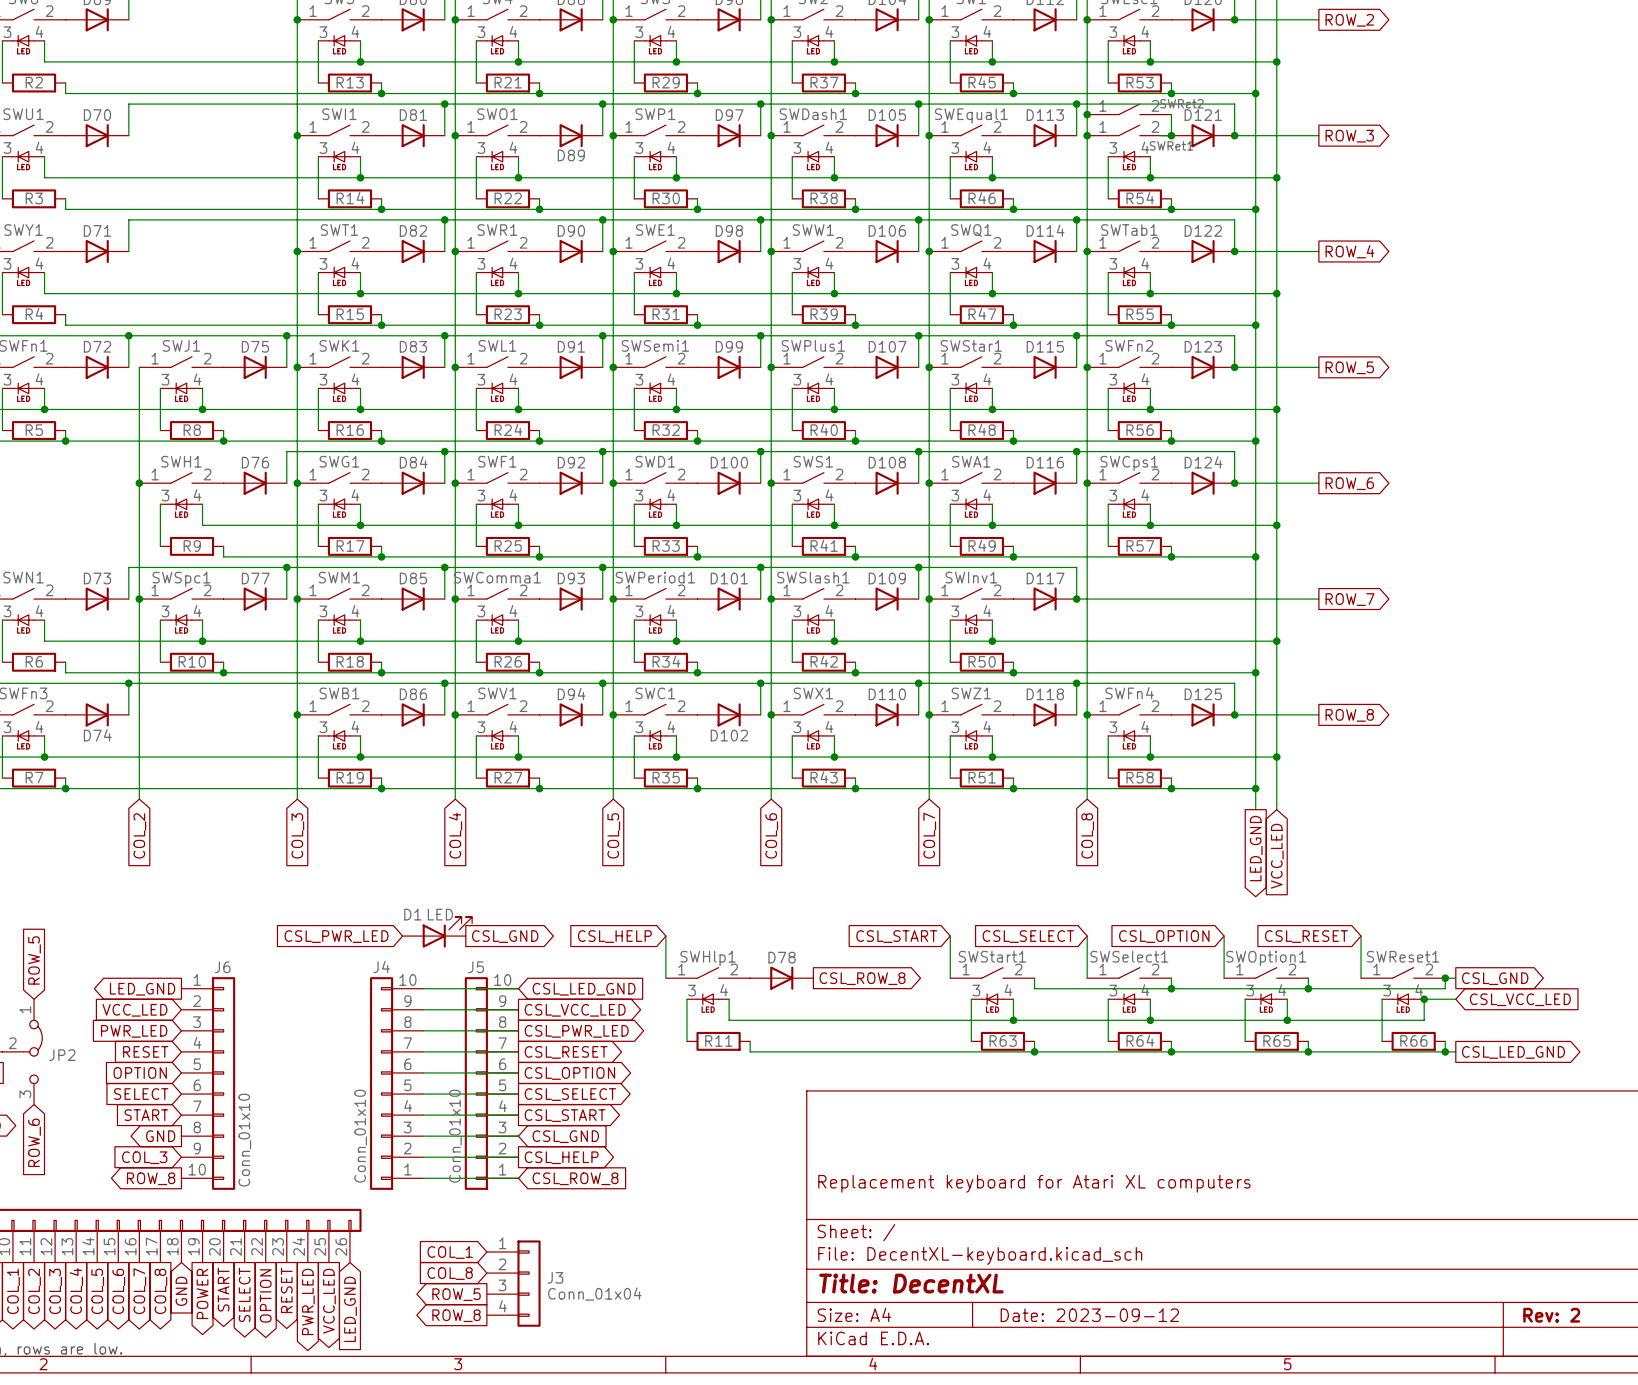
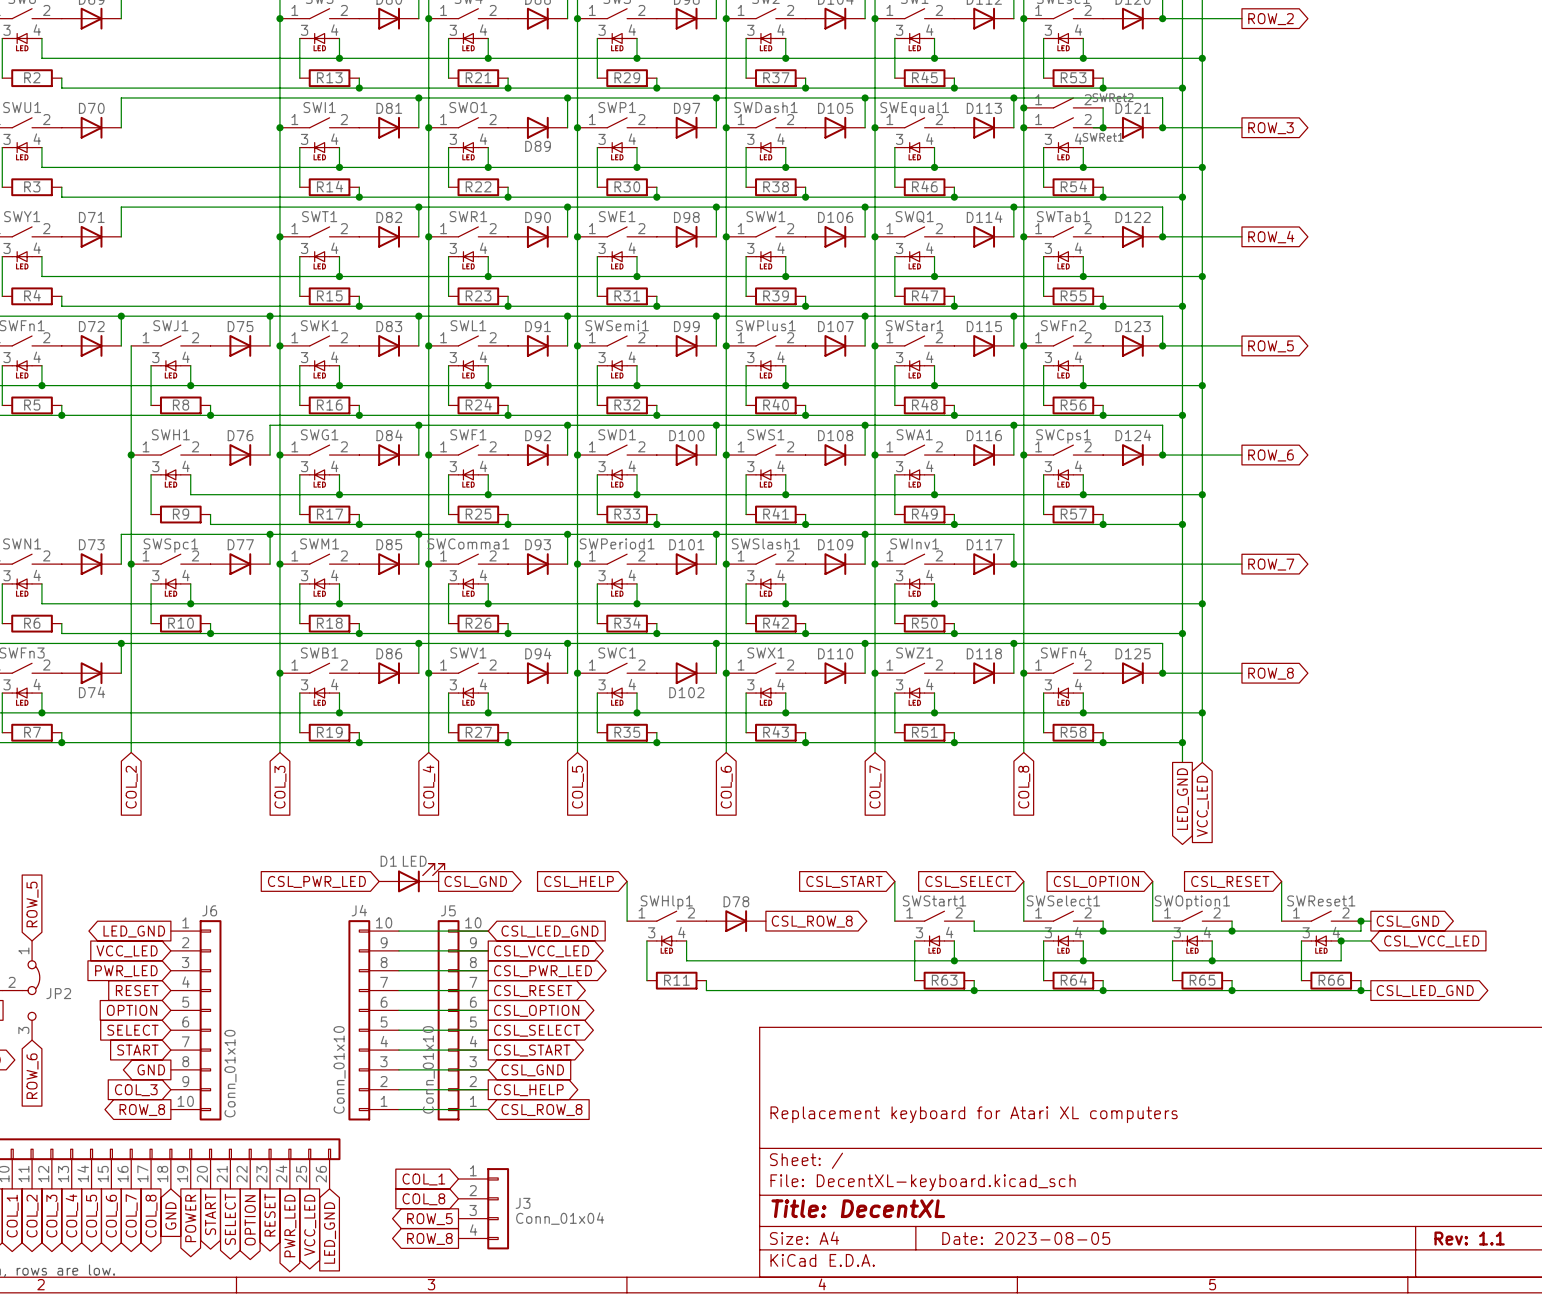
title block: Date: 2023-09-12 (1089, 1315) -> Date: 2023-08-05 (1026, 1238)
title block: Rev: 2 (1551, 1315) -> Rev: 1.1 (1469, 1238)

